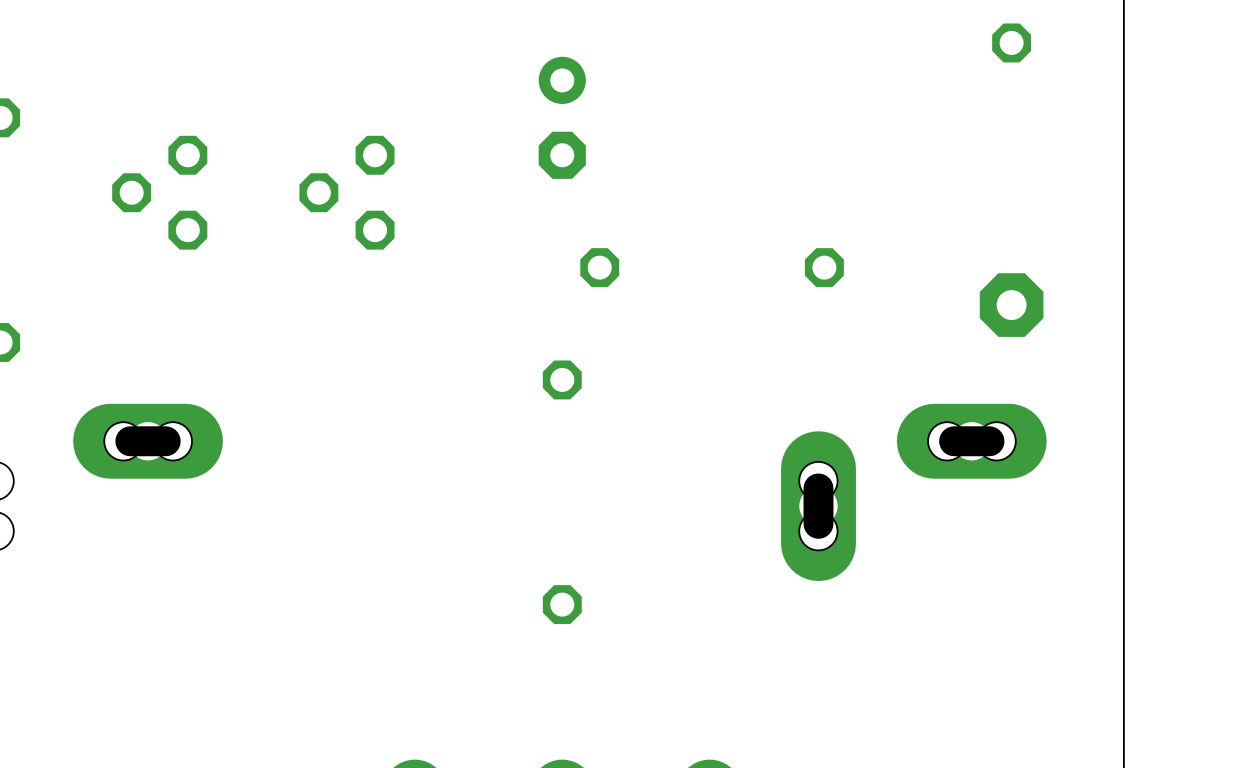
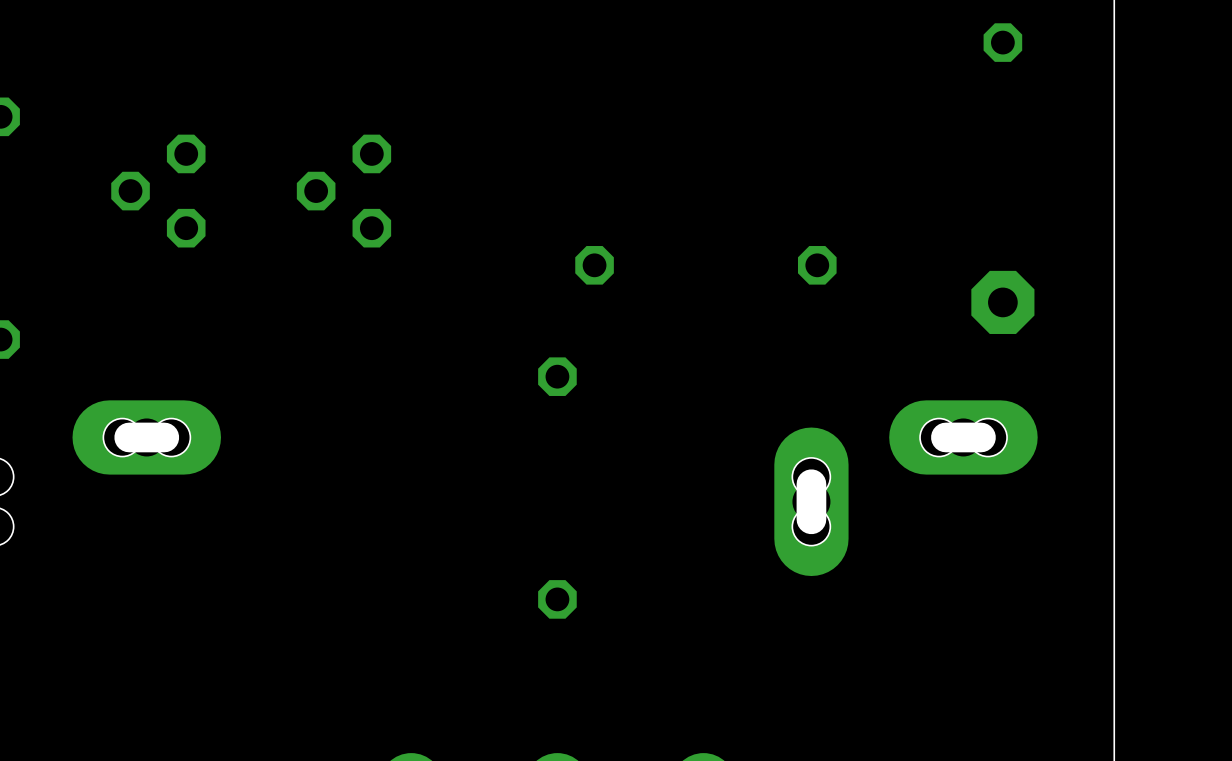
part: (562, 117) -> none

